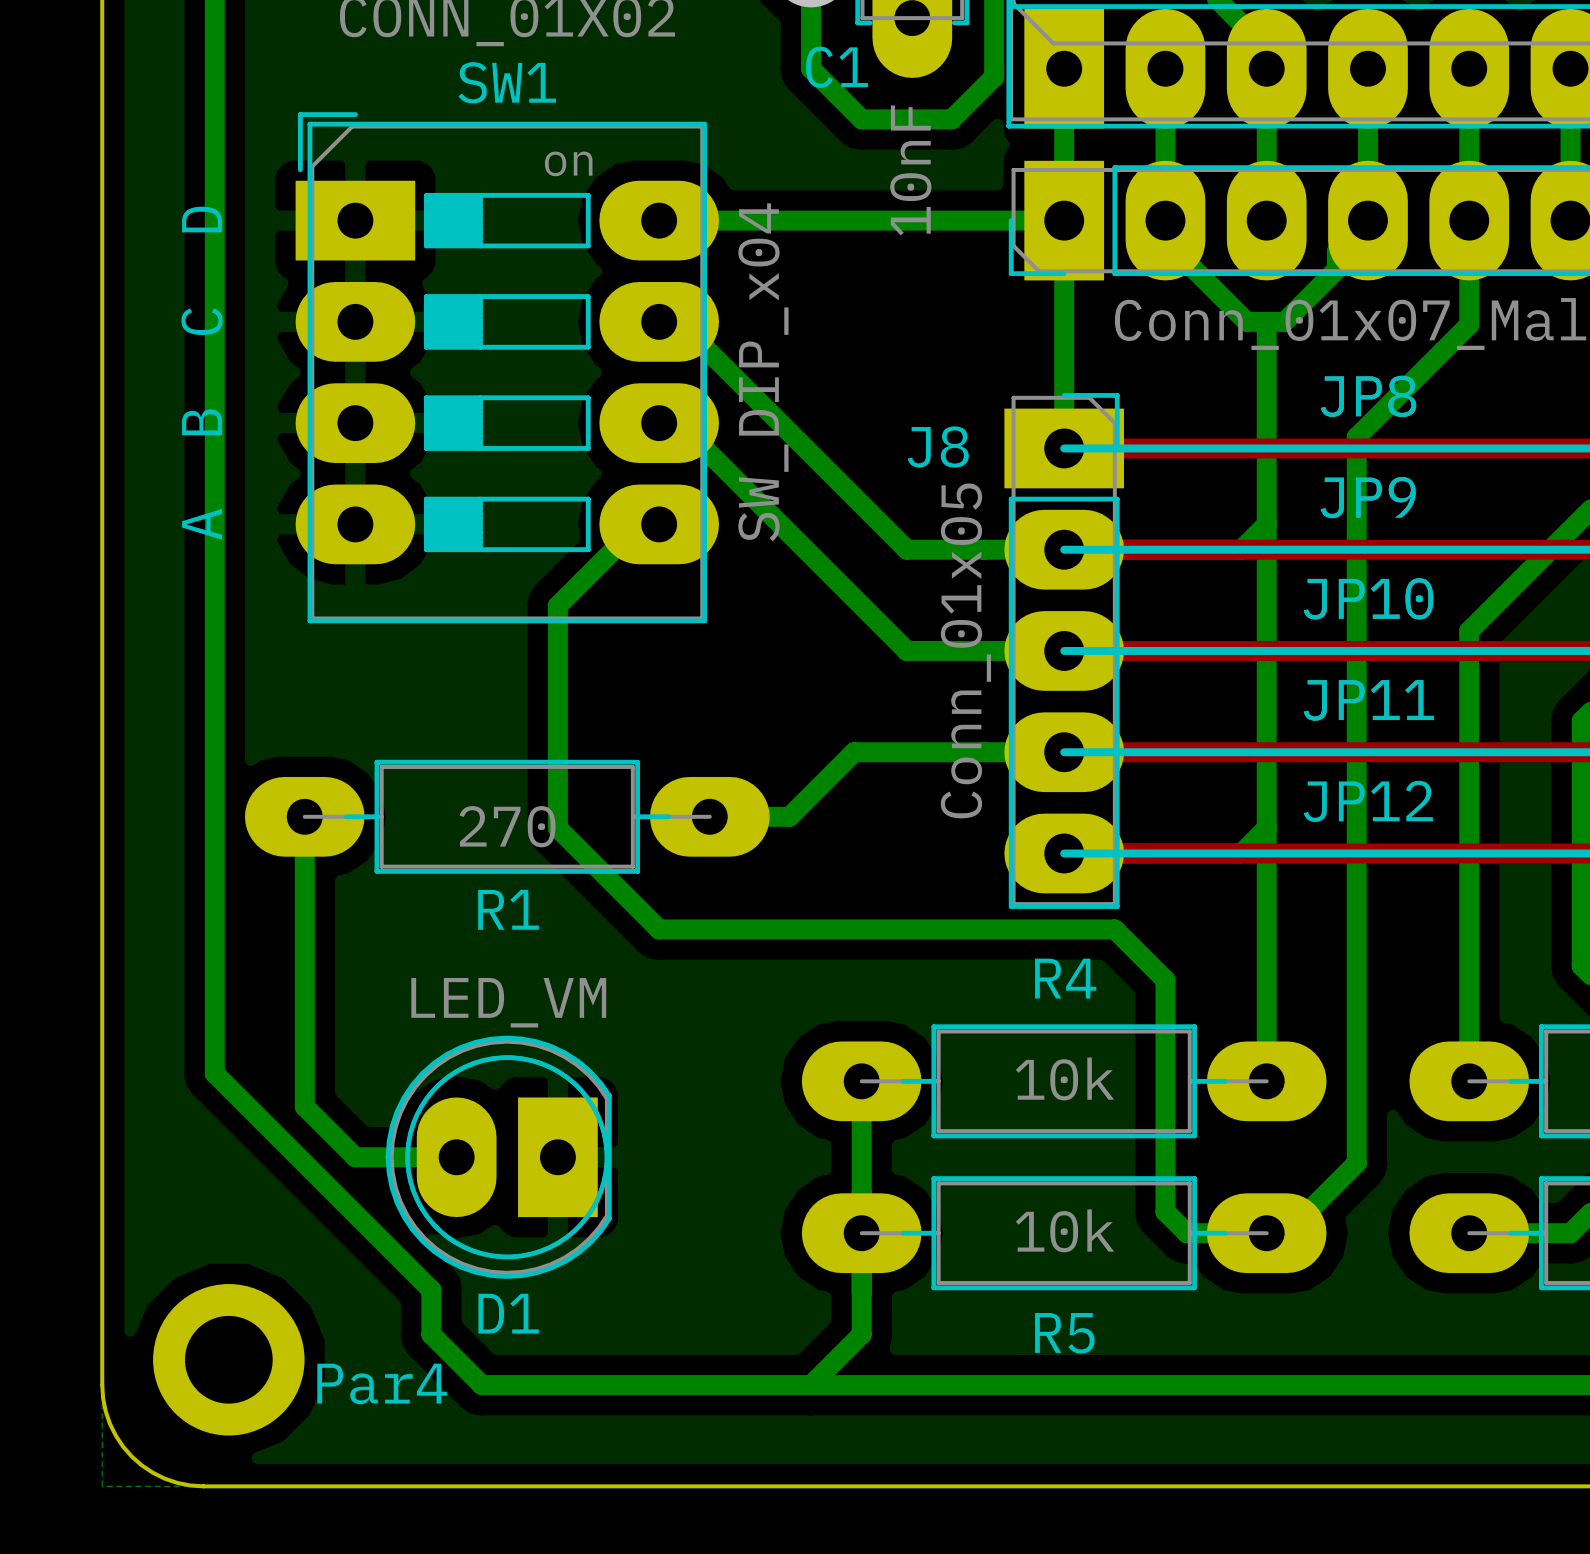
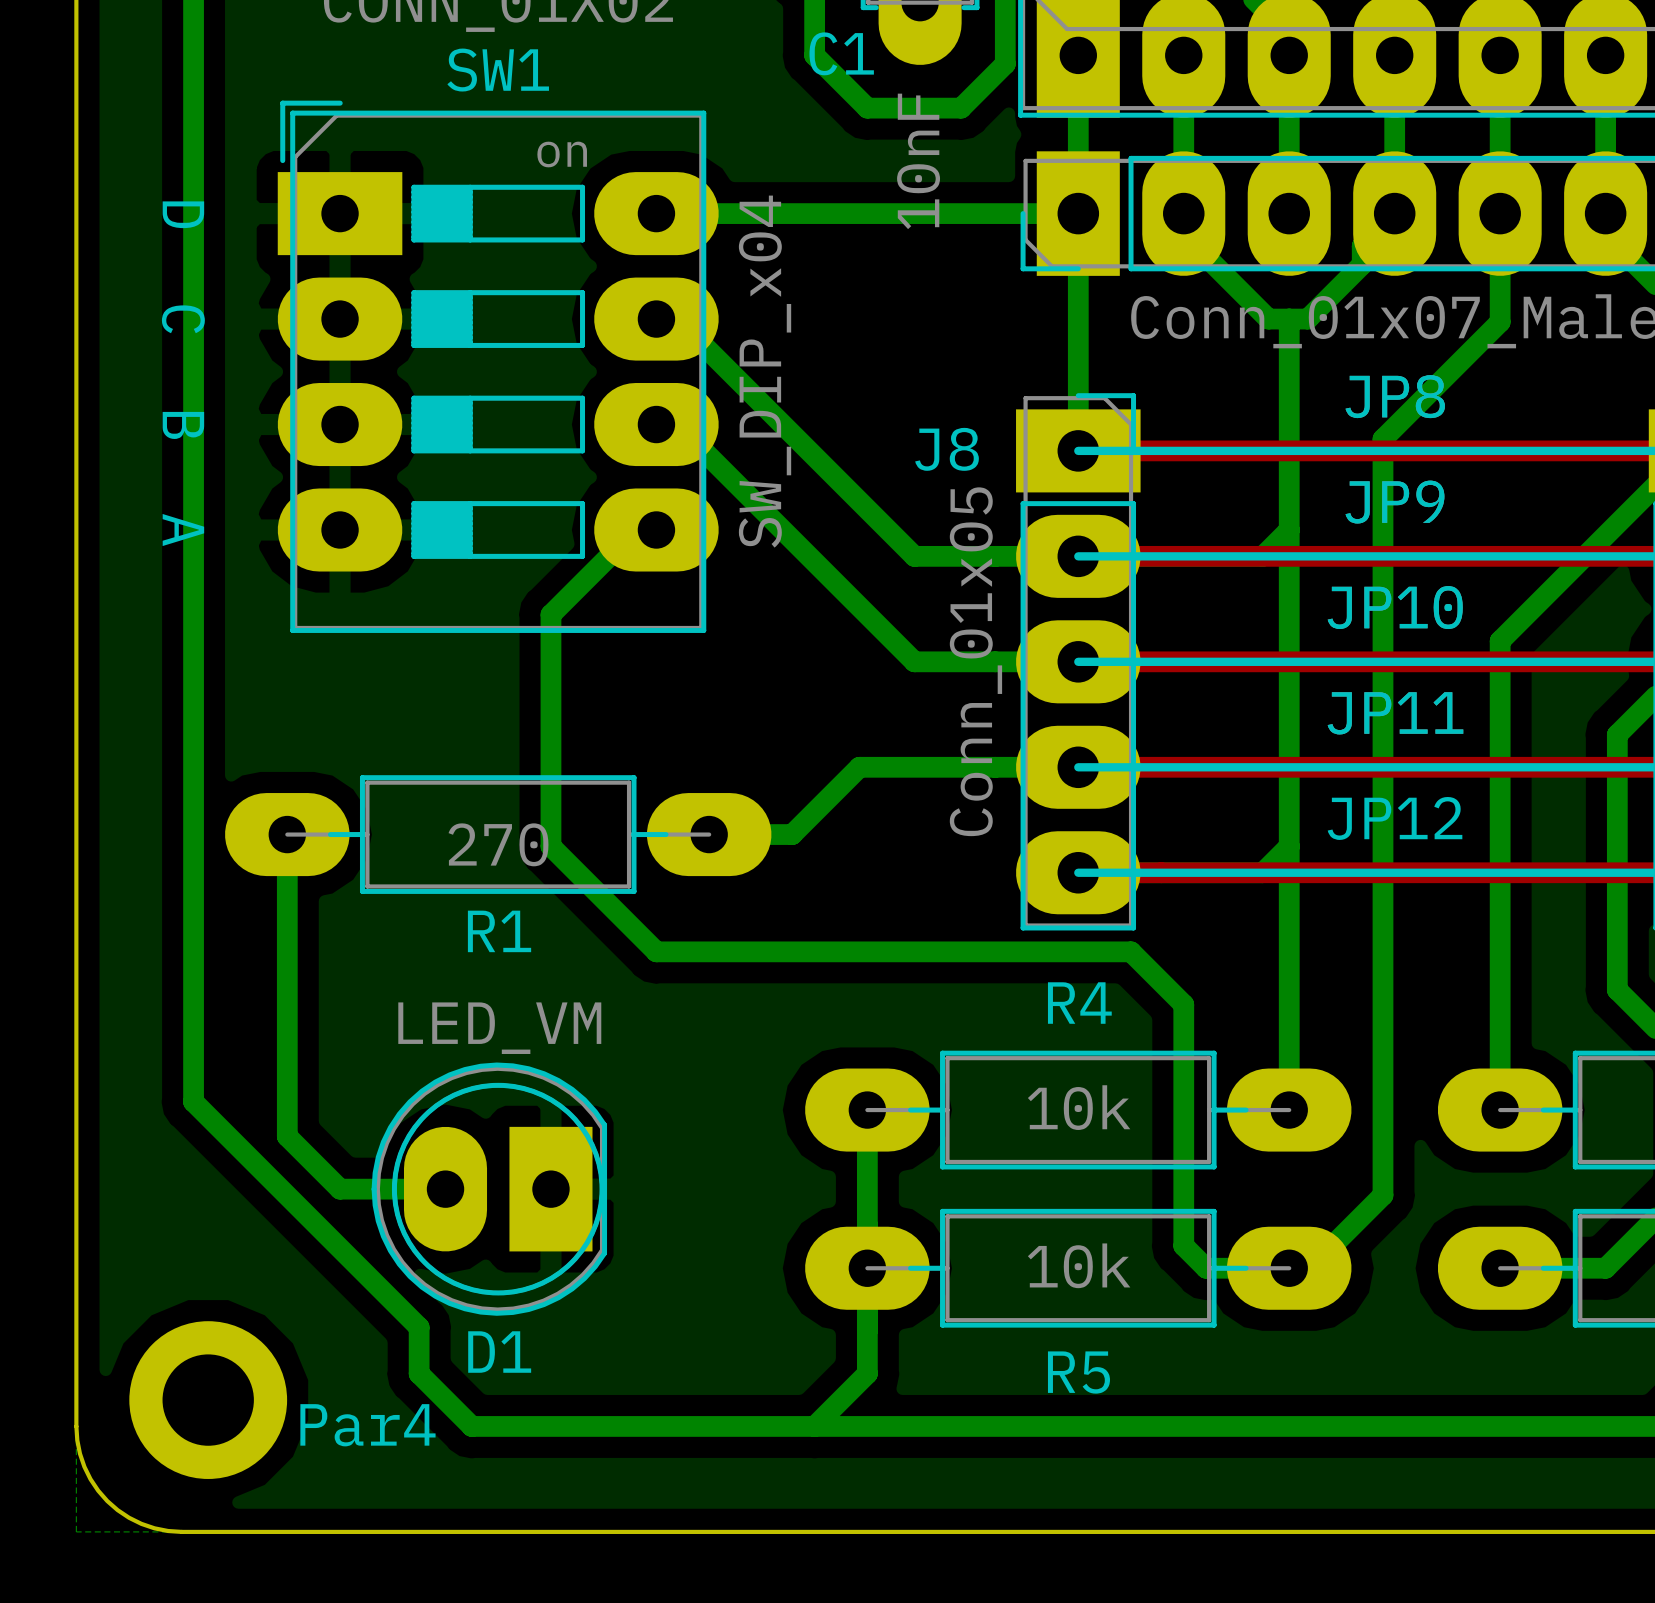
text rotation: 0° (202, 219) -> 180° (183, 214)
text rotation: 0° (202, 321) -> 180° (183, 319)
text rotation: 0° (202, 422) -> 180° (183, 425)
text rotation: 0° (202, 524) -> 180° (183, 530)

